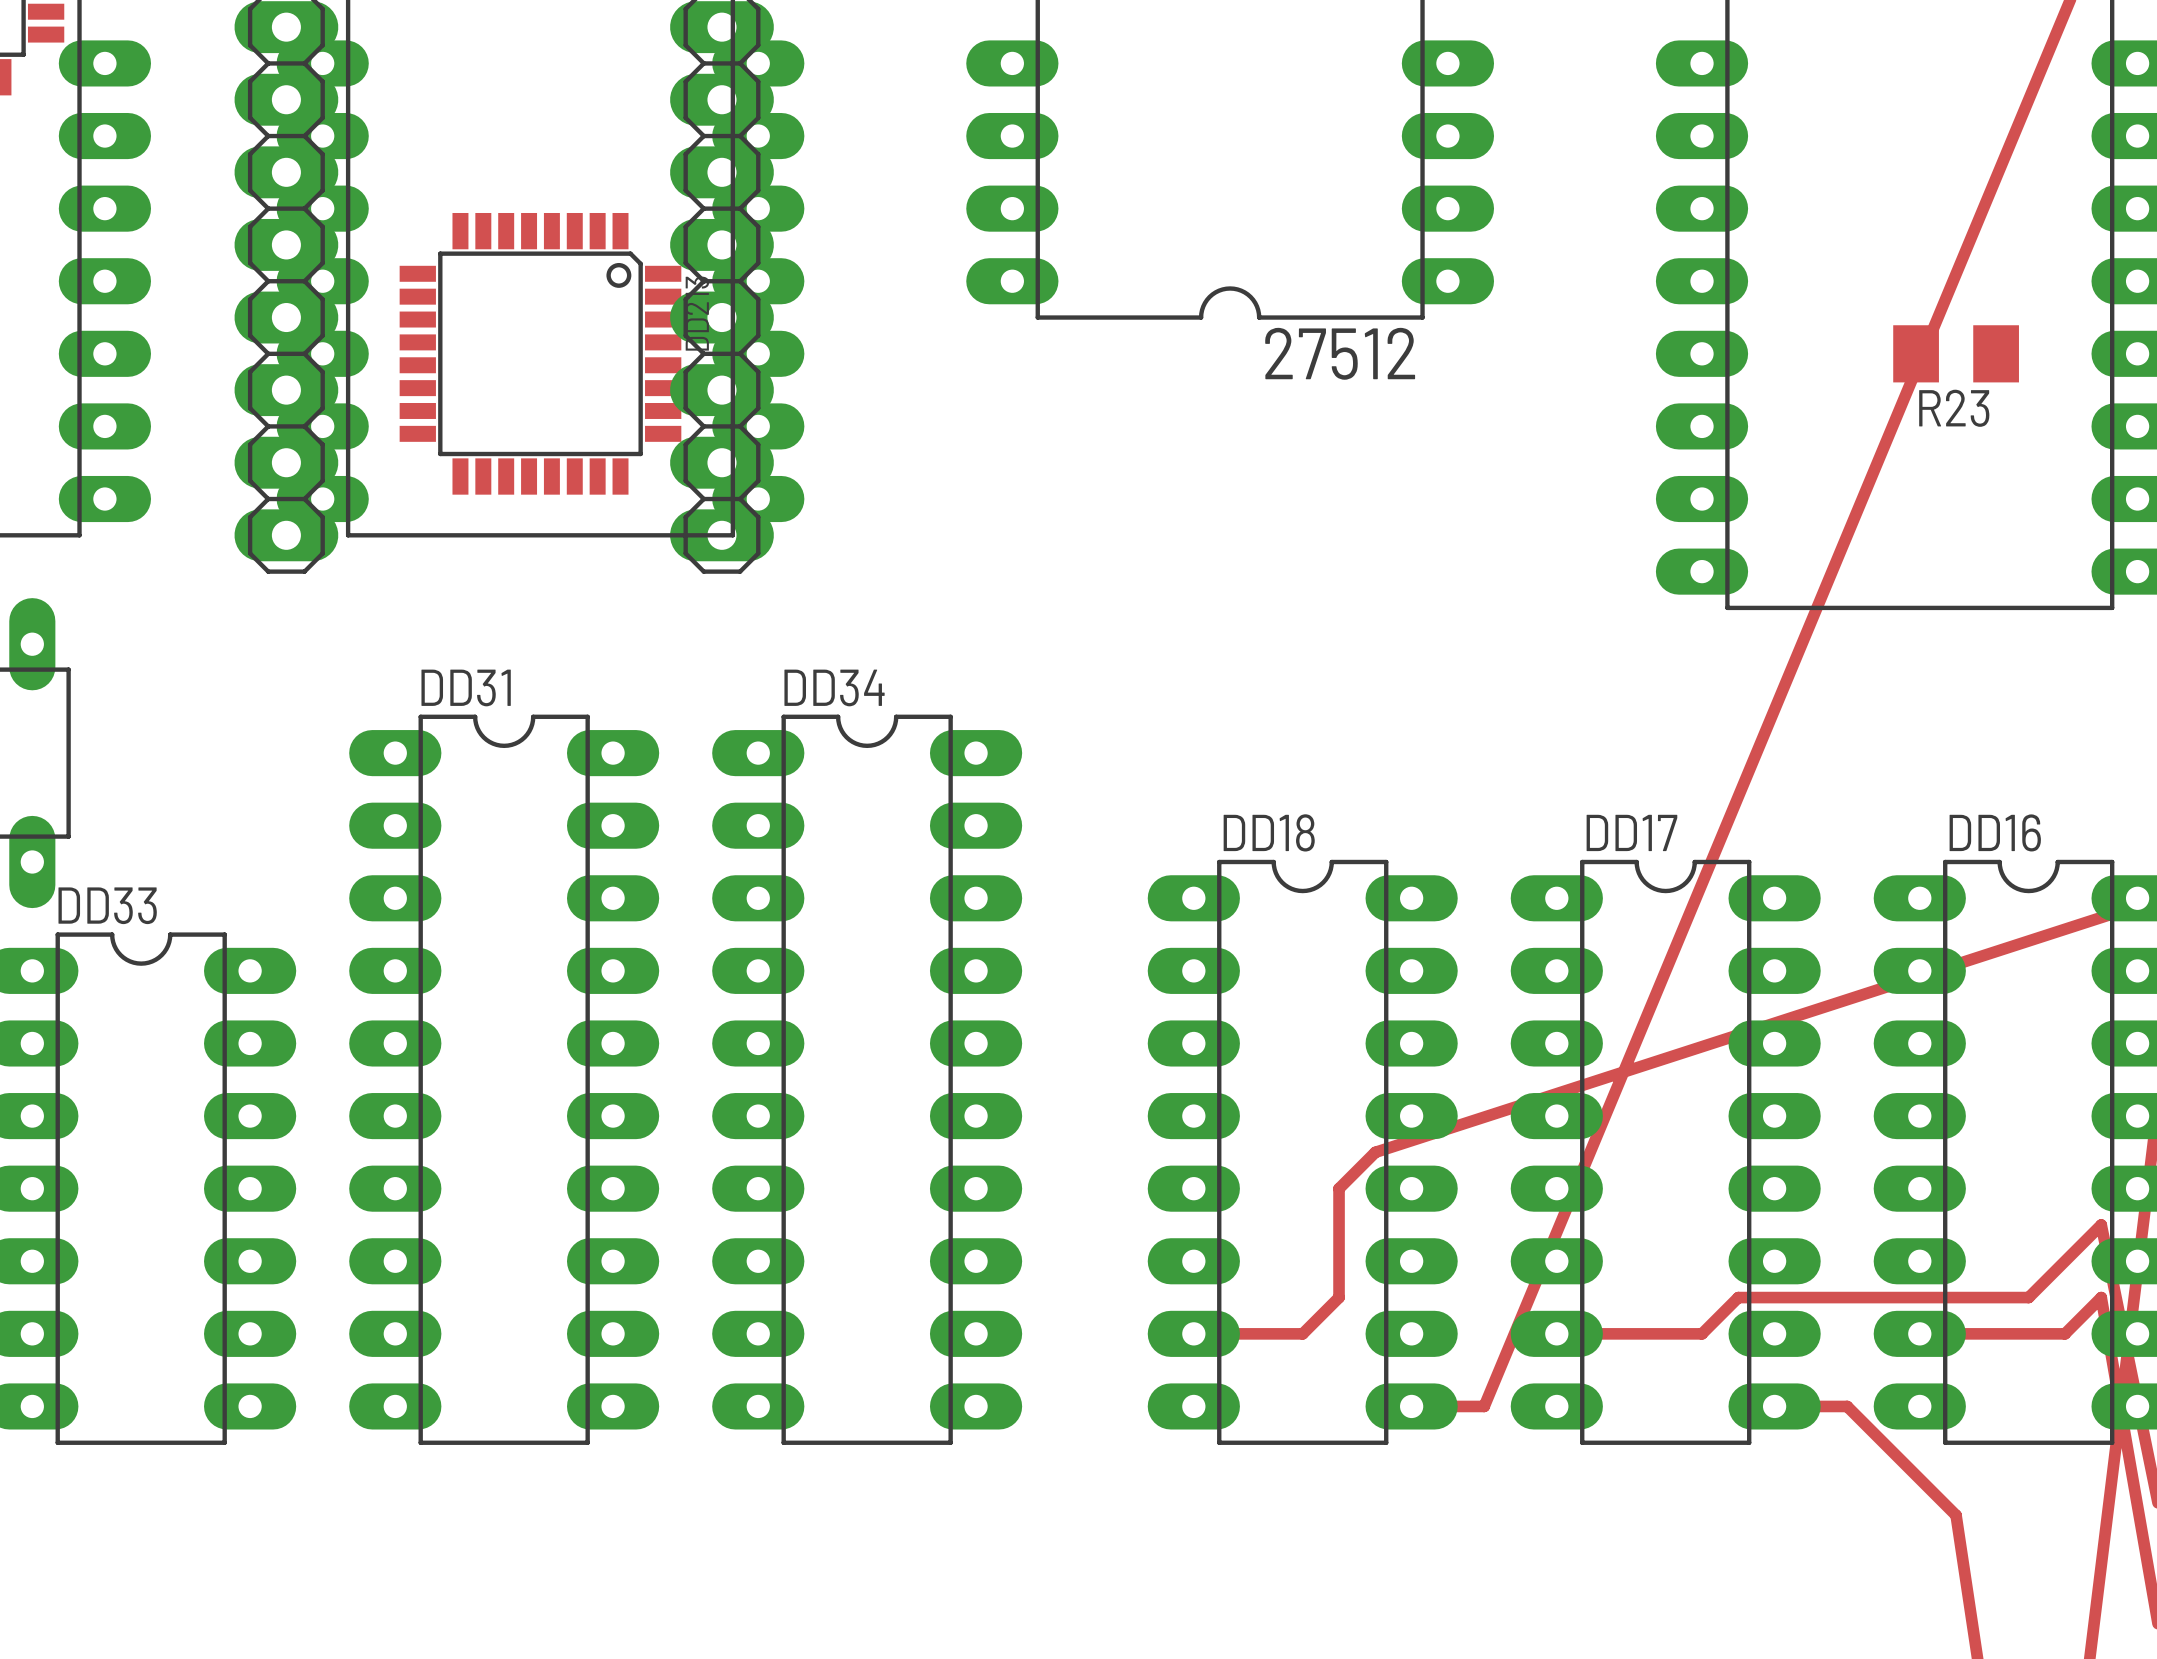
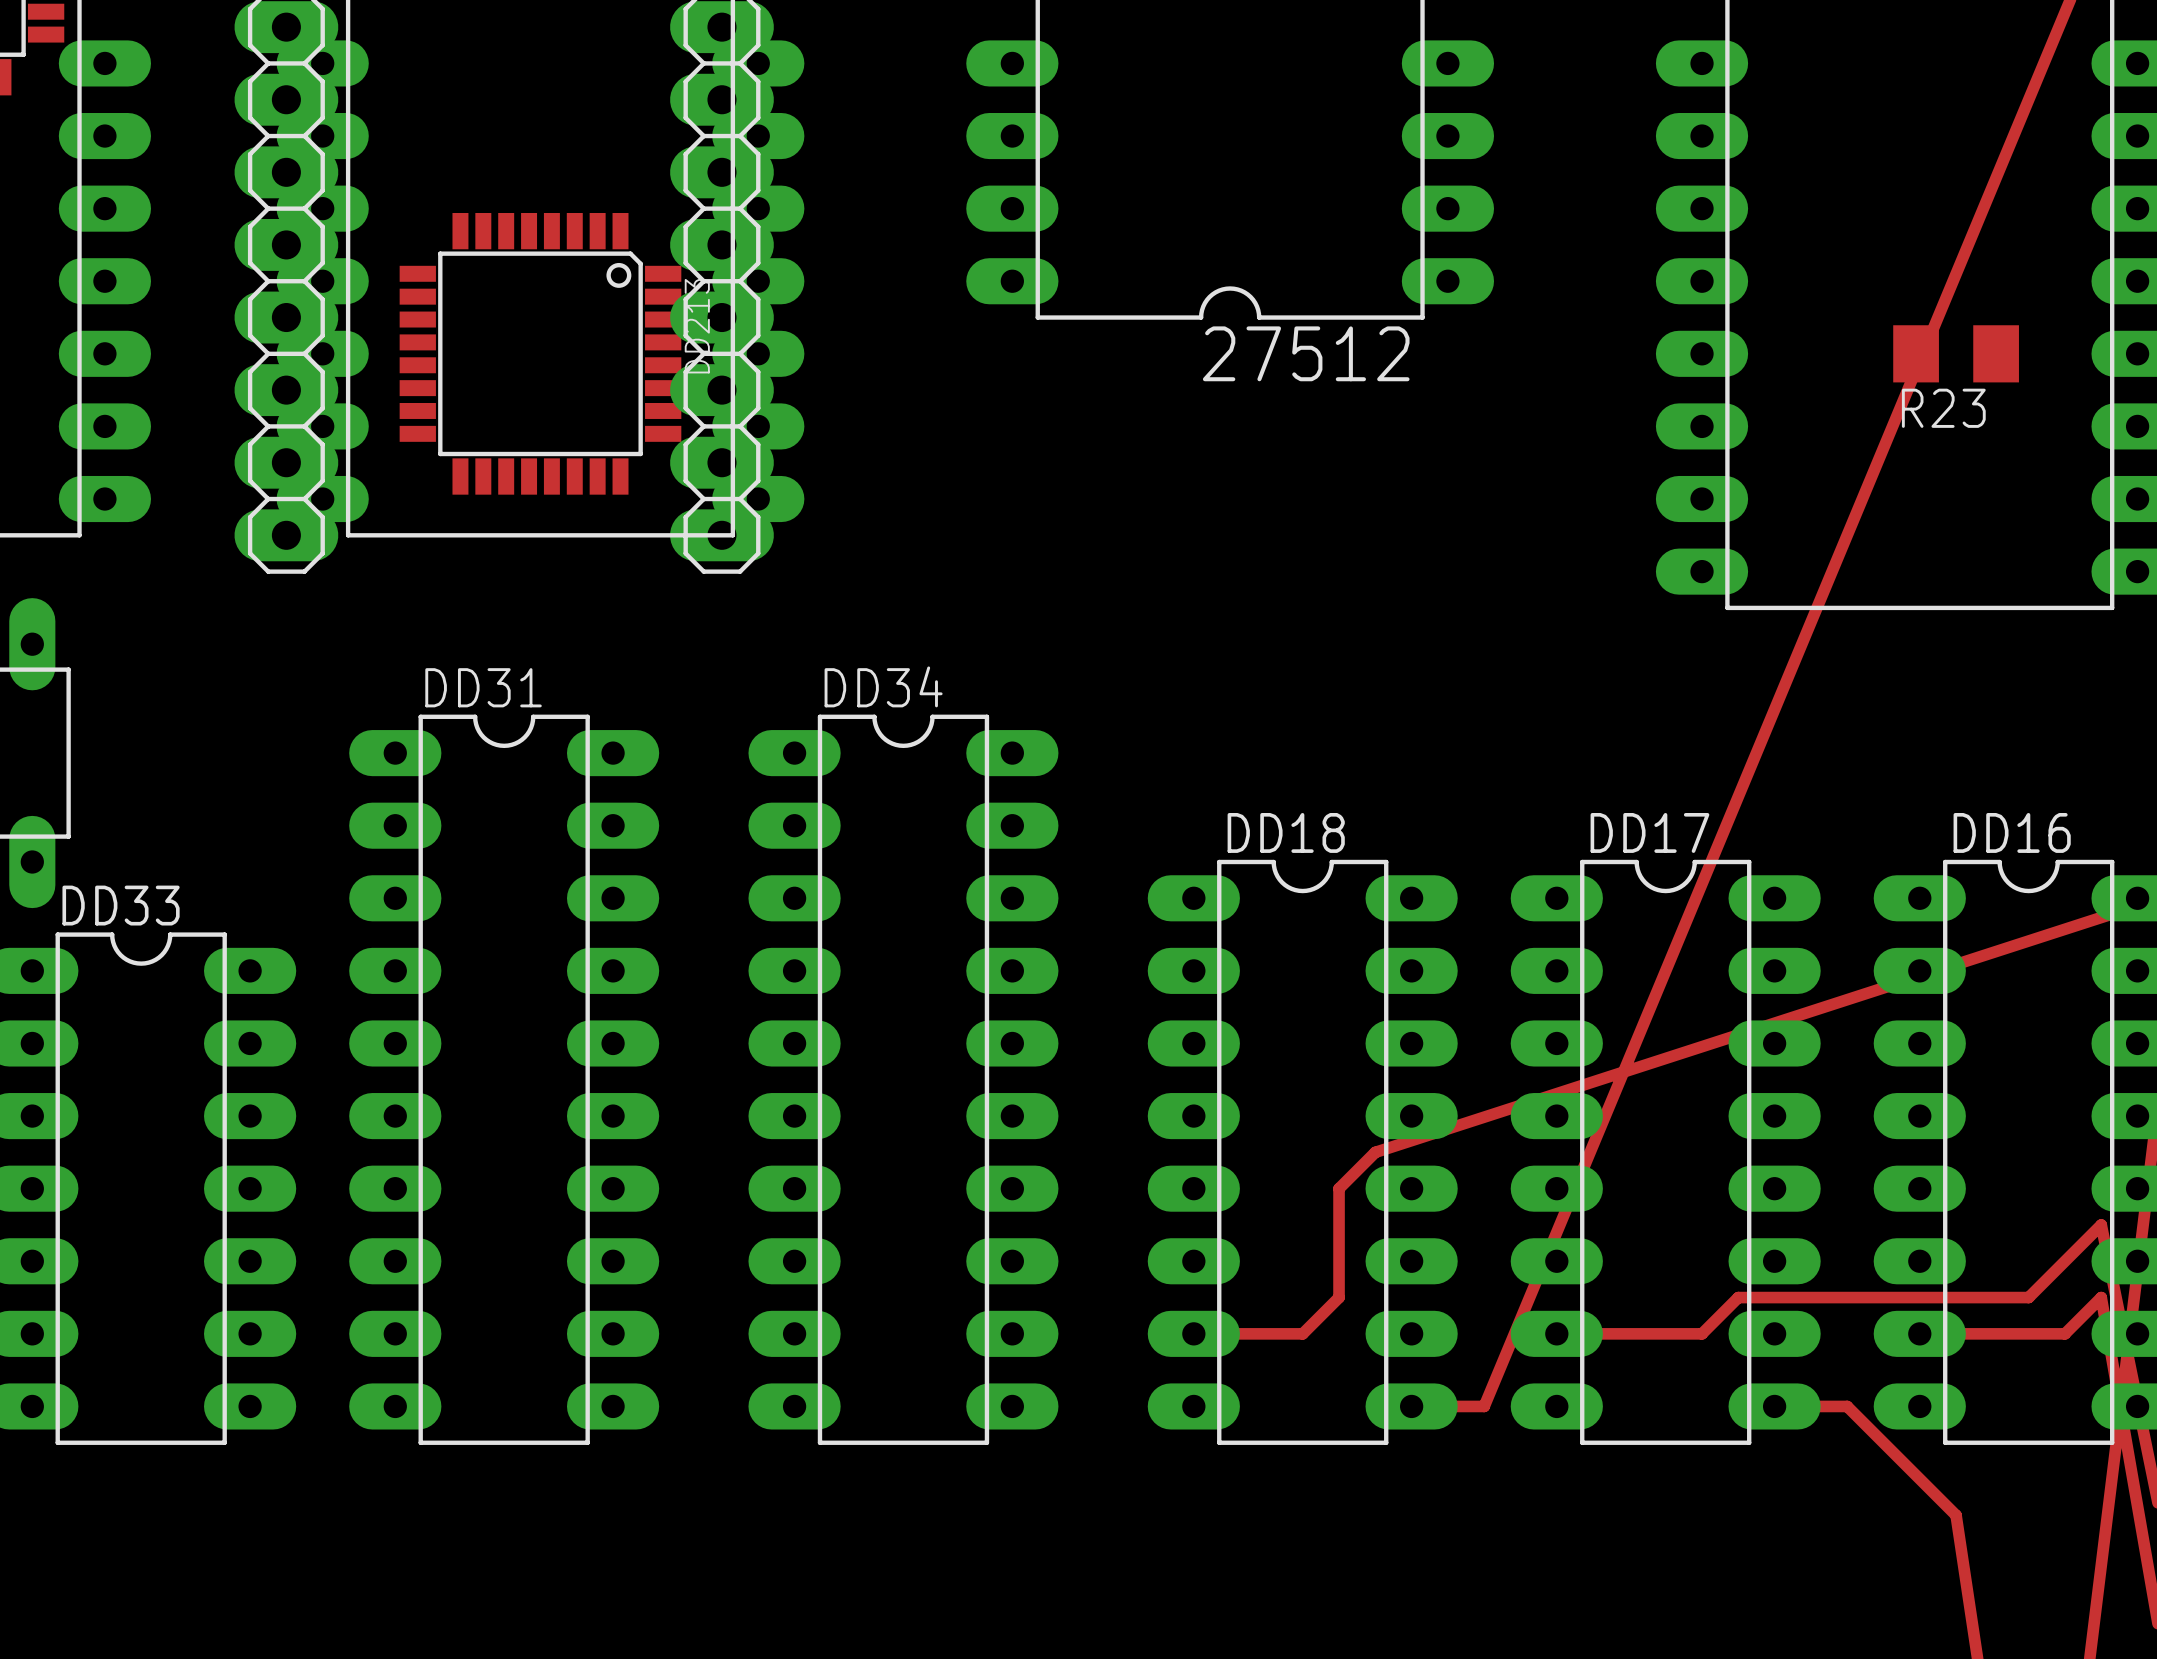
DD34 position: (867, 1079) -> (903, 1079)

